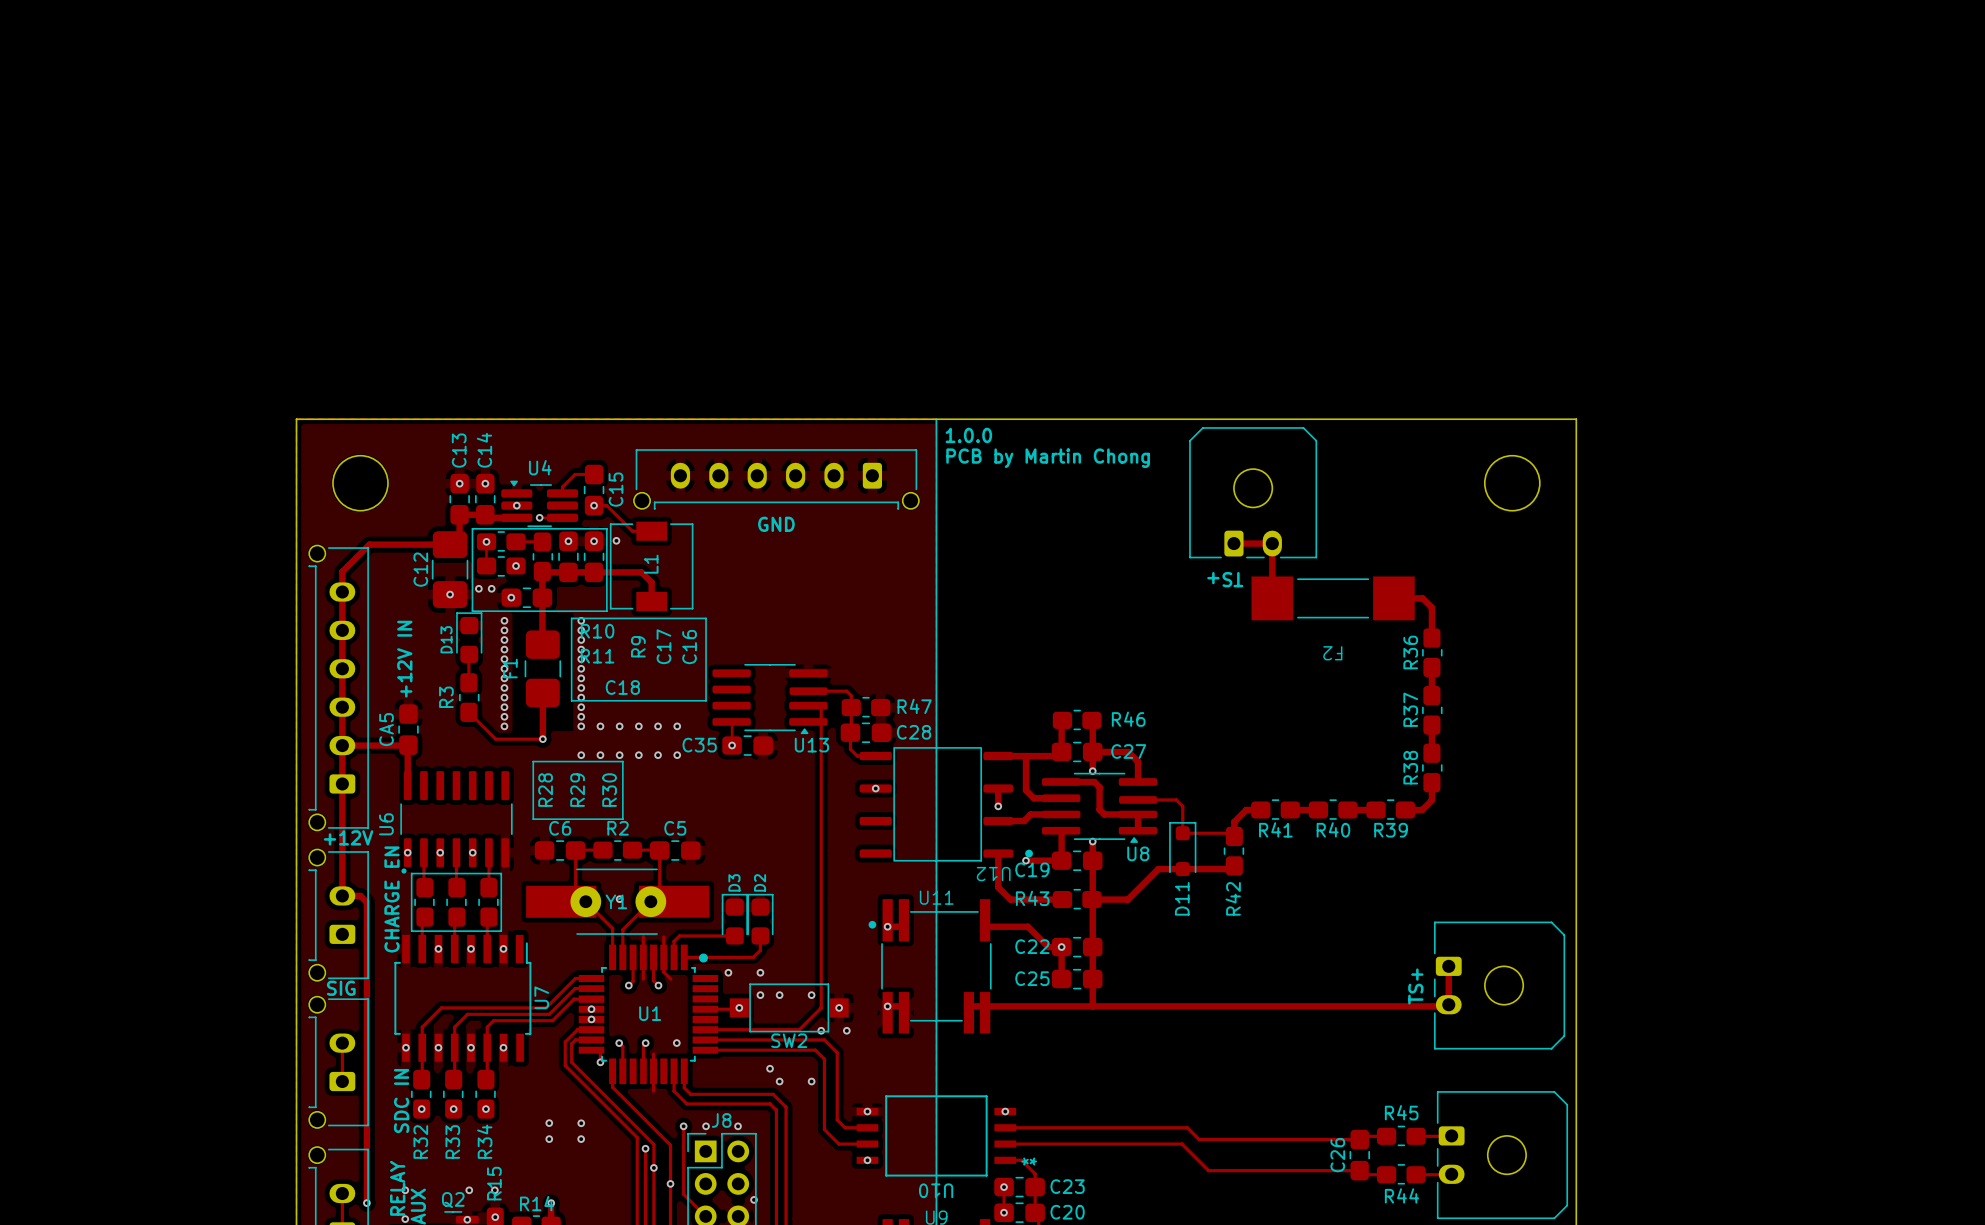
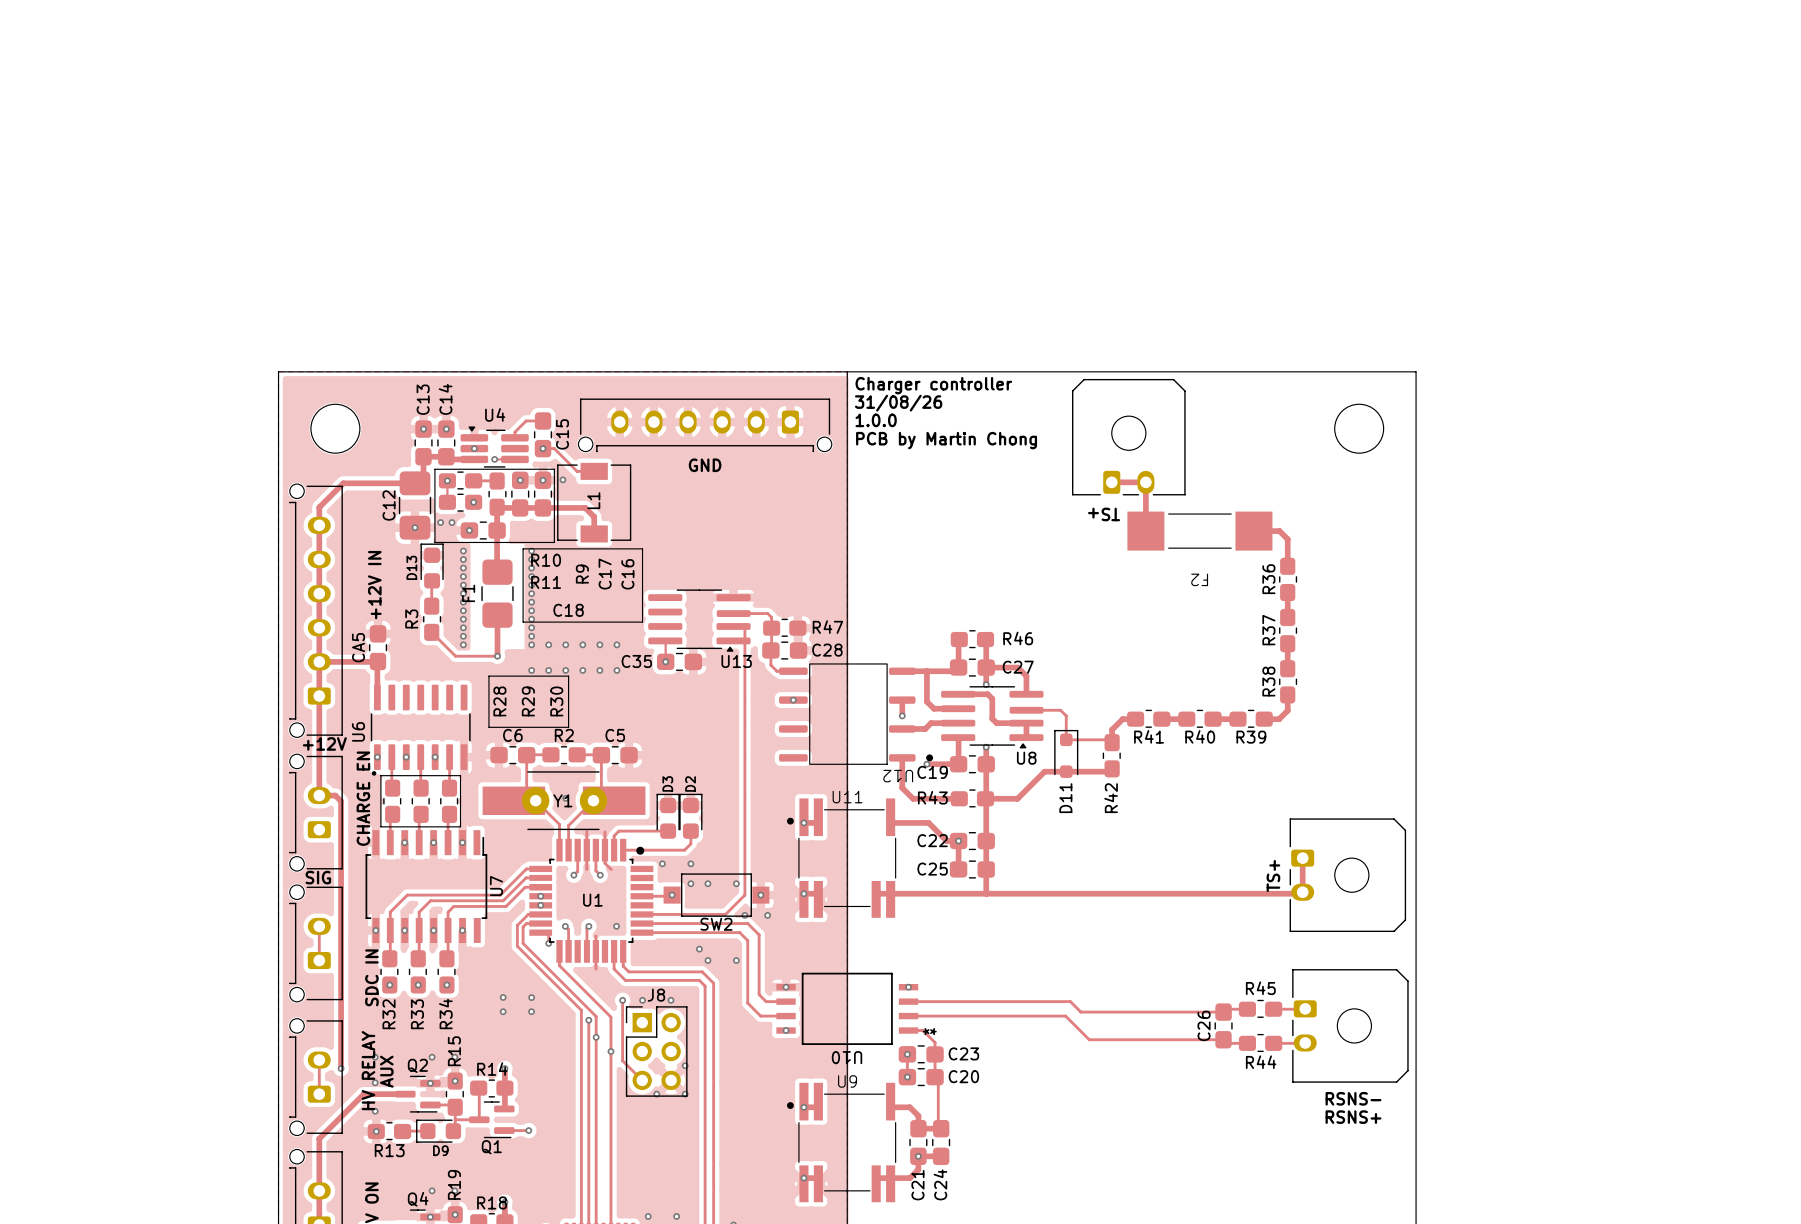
text: none -> Charger controller (933, 385)
text: 1.0.0 (968, 435) -> 31/08/26 (898, 403)
text: PCB by Martin Chong (1048, 458) -> 1.0.0 (876, 420)
text: none -> PCB by Martin Chong (946, 440)

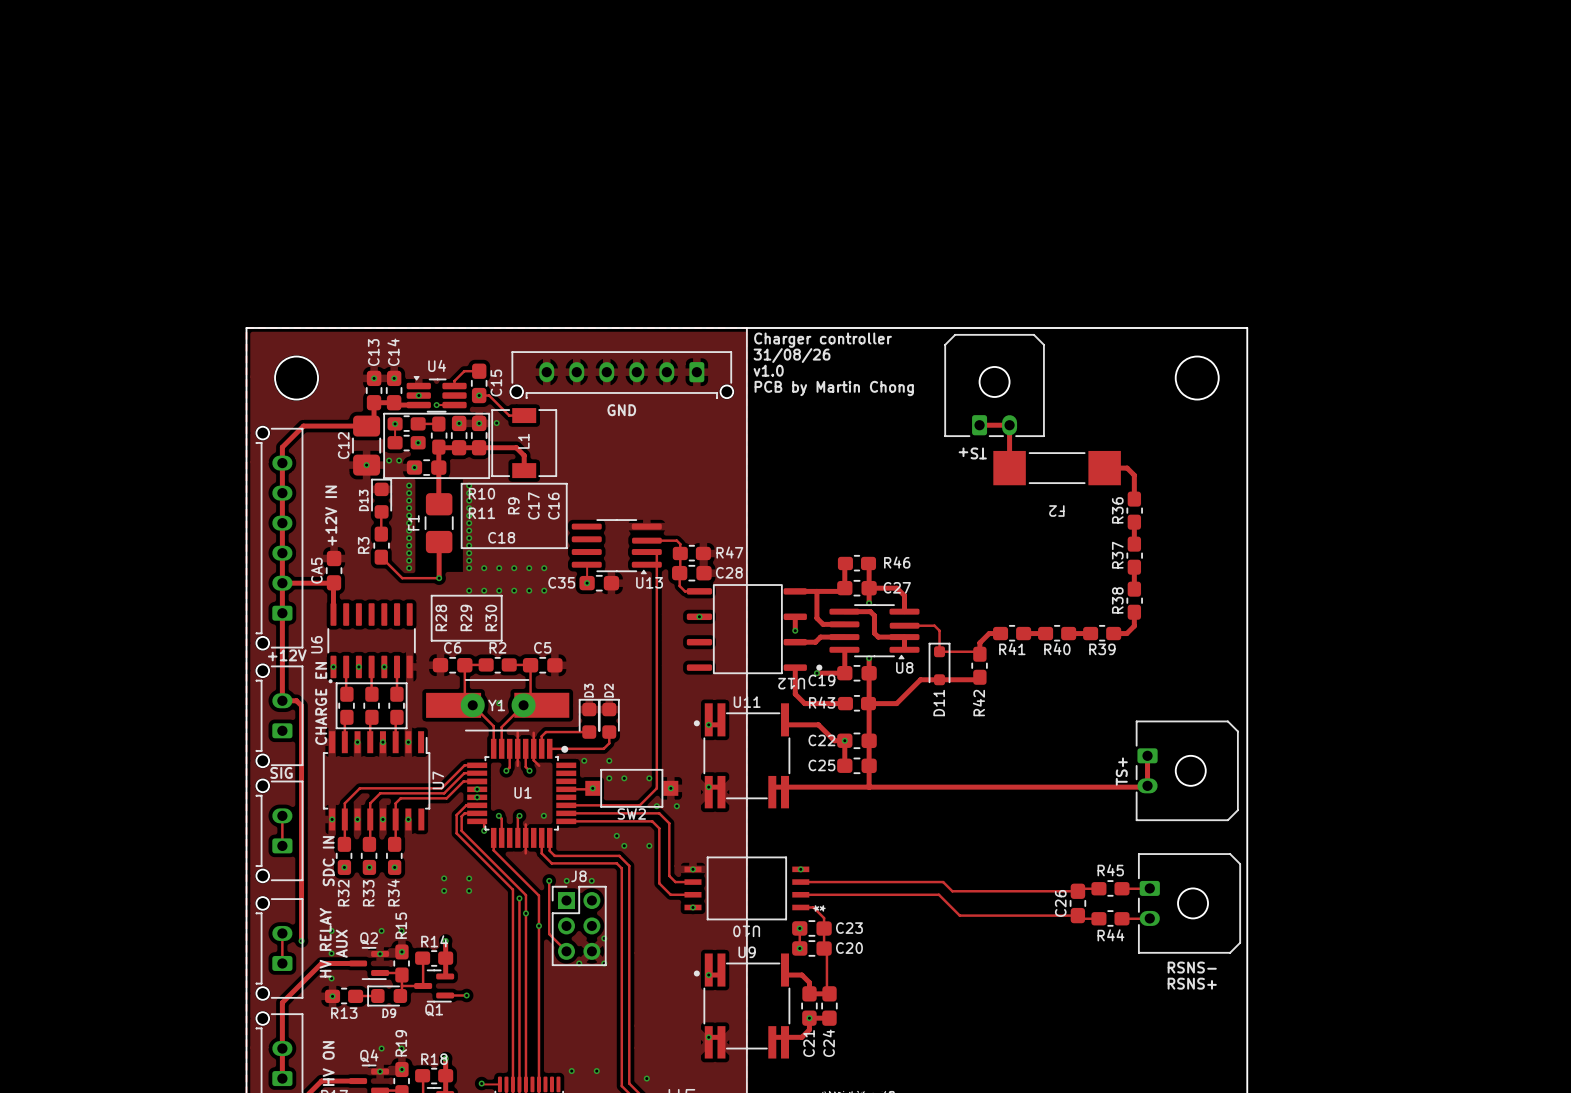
text: 1.0.0 (876, 420) -> v1.0 (768, 370)

